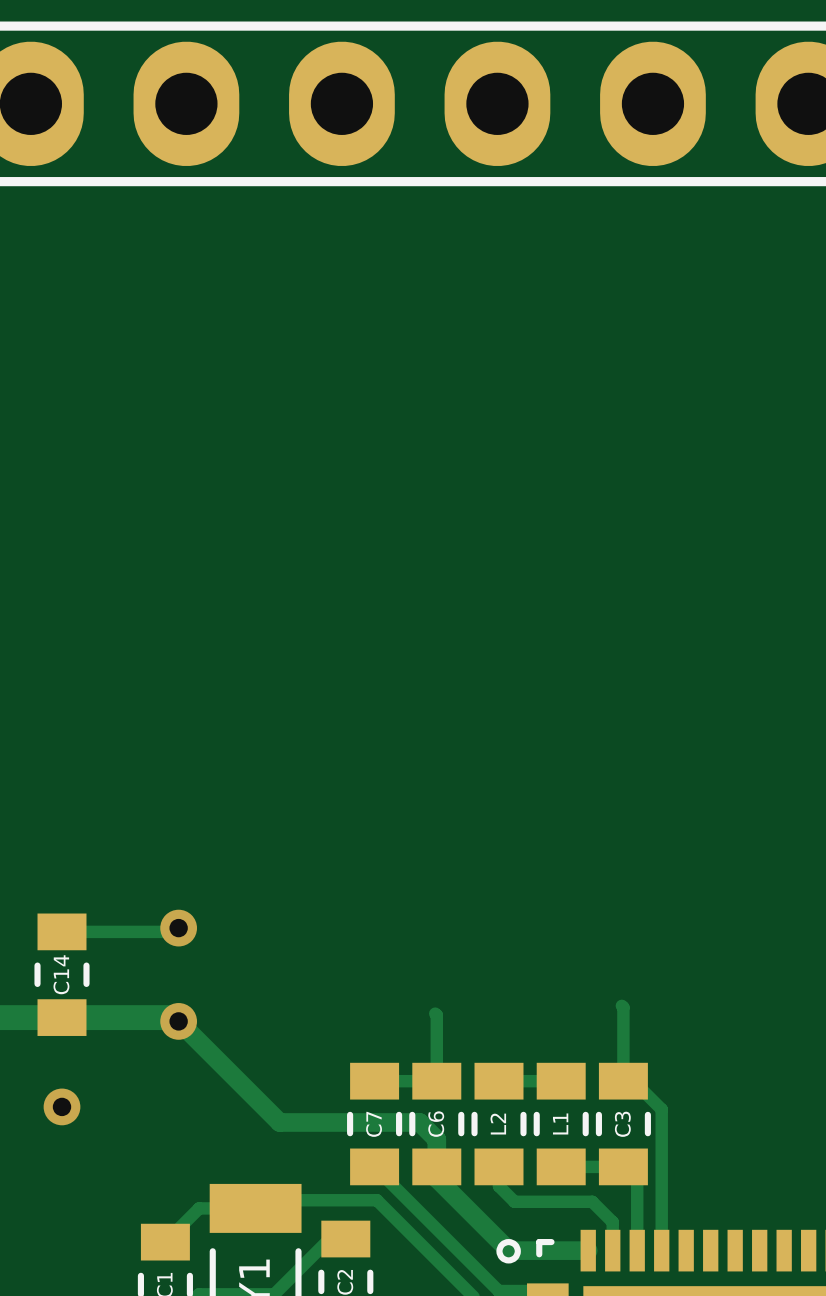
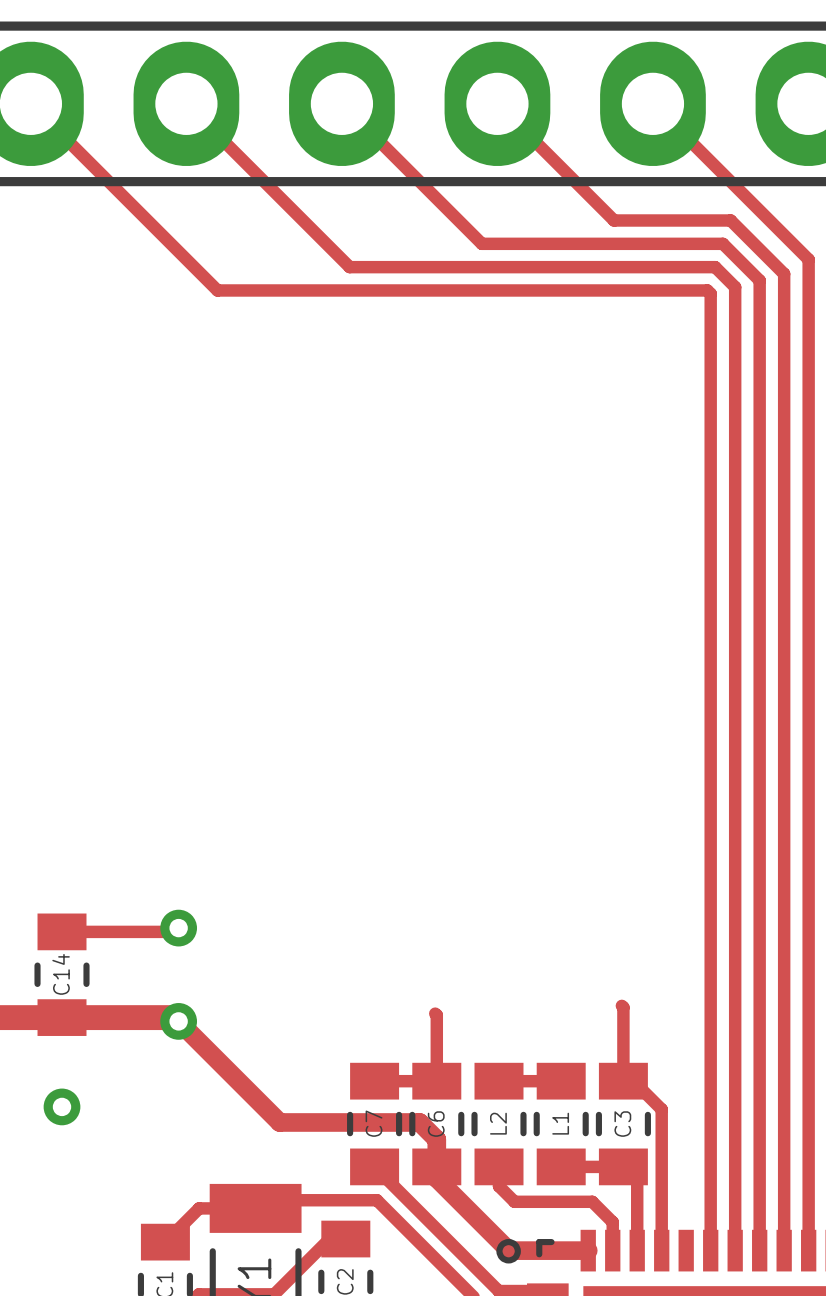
track: none -> (30, 103) (217, 290) (707, 290) (710, 293) (710, 1250)
track: none -> (186, 103) (349, 267) (715, 267) (735, 287) (735, 1250)
track: none -> (341, 103) (481, 243) (722, 243) (759, 280) (759, 1250)
track: none -> (497, 103) (614, 220) (730, 220) (784, 273) (784, 1250)
track: none -> (652, 103) (808, 259) (808, 1250)

